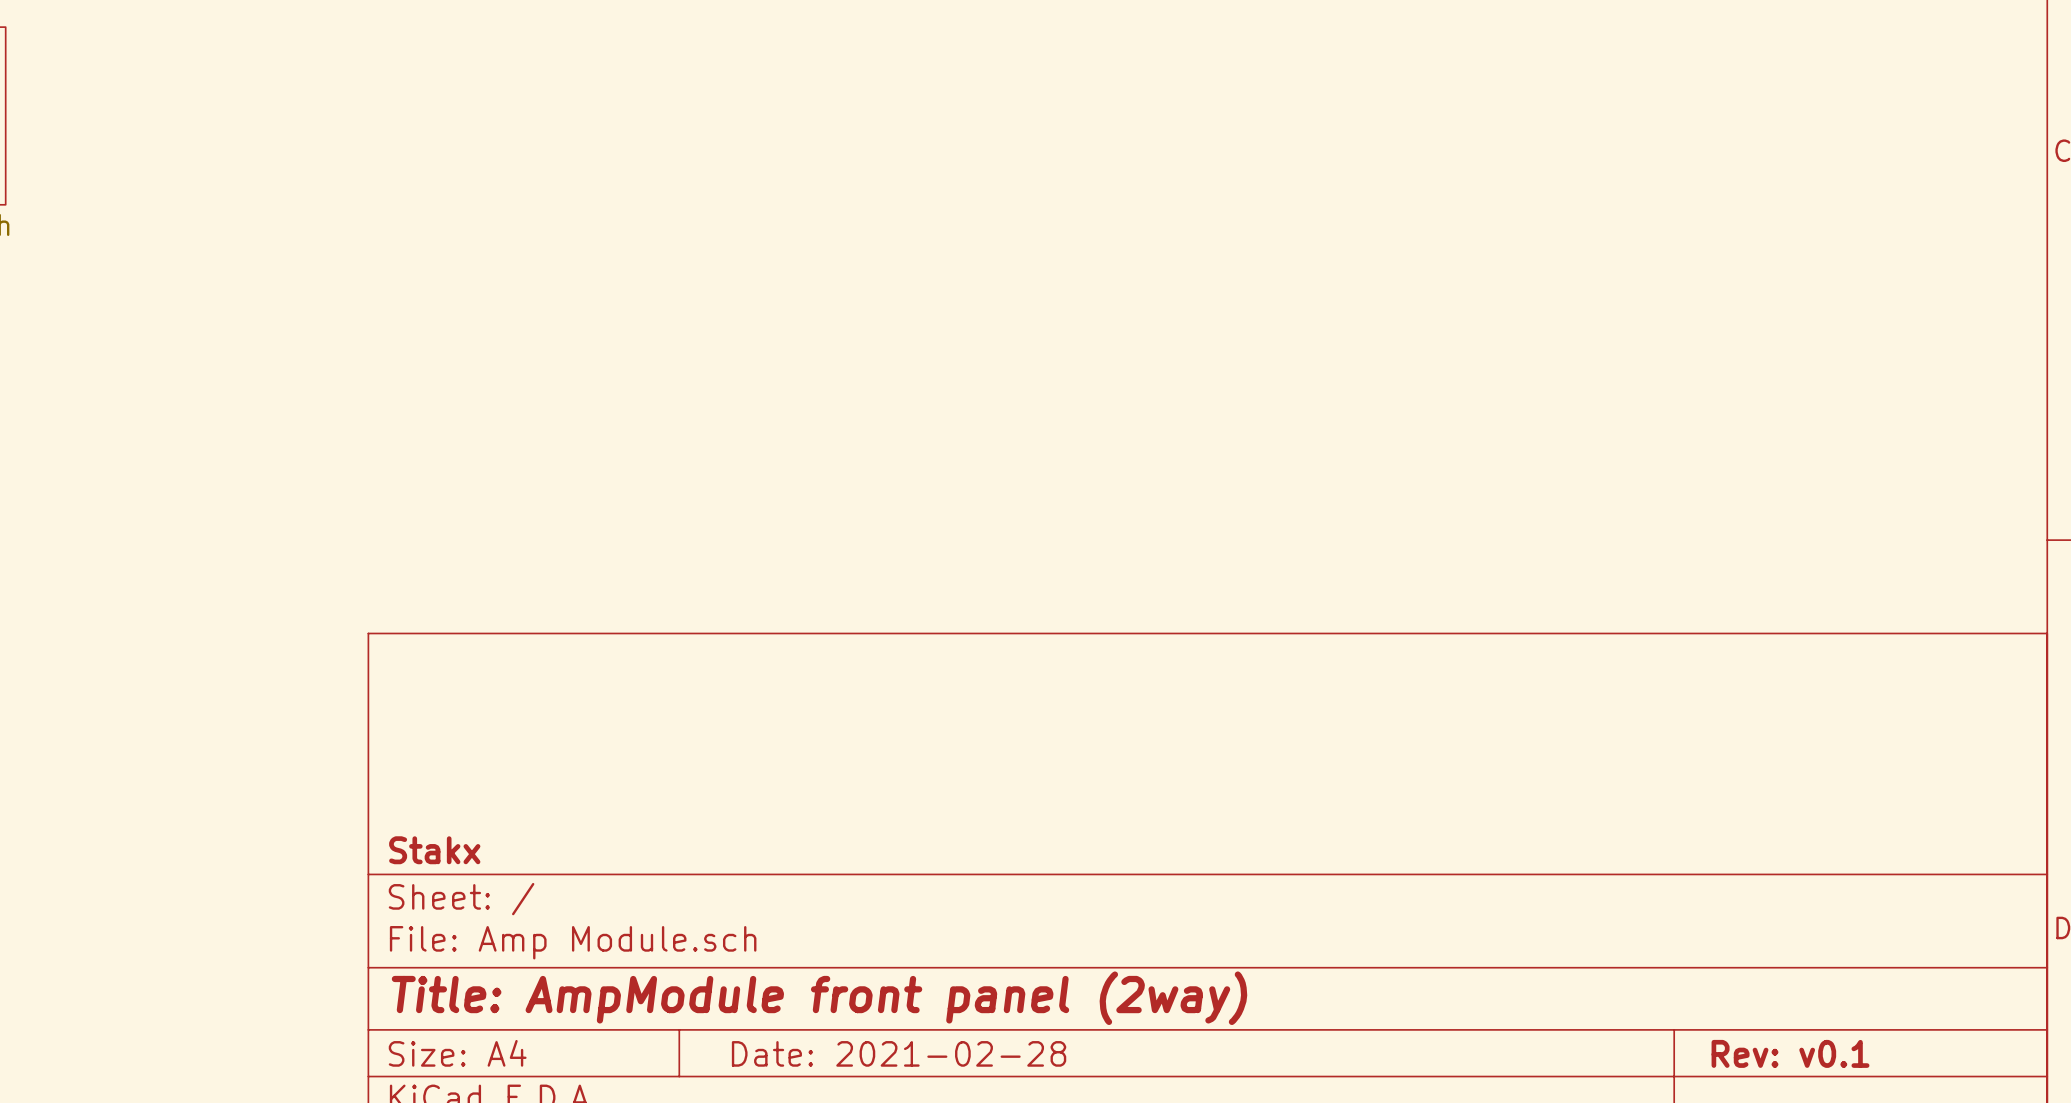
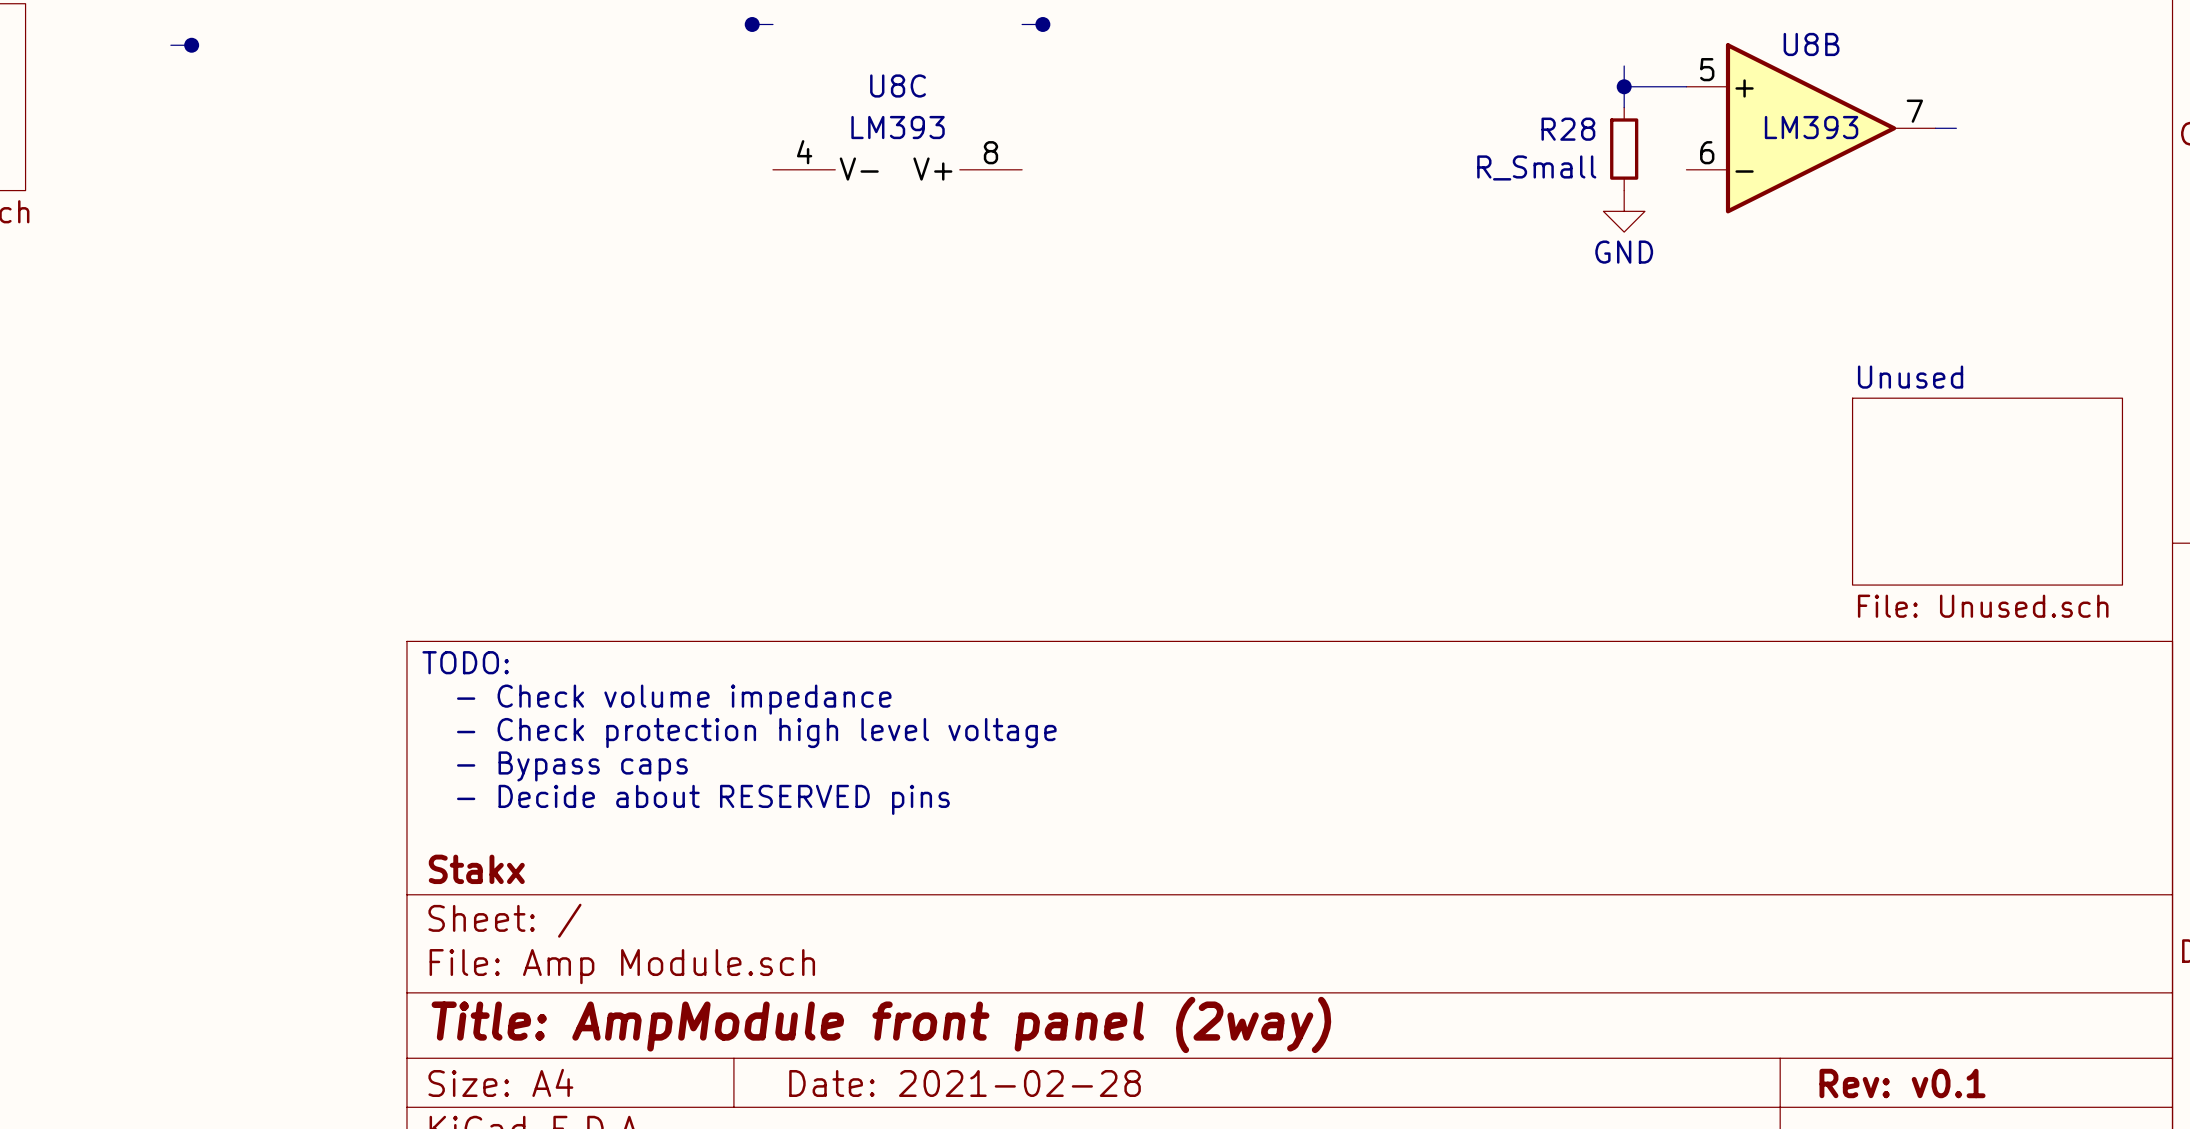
wire: none -> (752, 24) (772, 24)
junction: none -> (752, 24)
wire: none -> (1022, 24) (1042, 24)
junction: none -> (1042, 24)
wire: none -> (170, 45) (191, 45)
junction: none -> (191, 45)
wire: none -> (1624, 66) (1624, 107)
wire: none -> (1624, 86) (1686, 86)
junction: none -> (1624, 86)
U8B: none -> LM393 (1811, 128)
wire: none -> (1935, 128) (1956, 128)
R28: none -> R_Small (1624, 149)
U8C: none -> LM393 (897, 169)
power symbol: none -> GND (1624, 211)
sheet Unused: none -> File: Unused.sch (1987, 491)
text: none -> TODO: (465, 662)
text: none -> - Check volume impedance (674, 699)
text: none -> - Check protection high level voltage (756, 733)
text: none -> - Bypass caps (572, 766)
text: none -> - Decide about RESERVED pins (703, 799)

